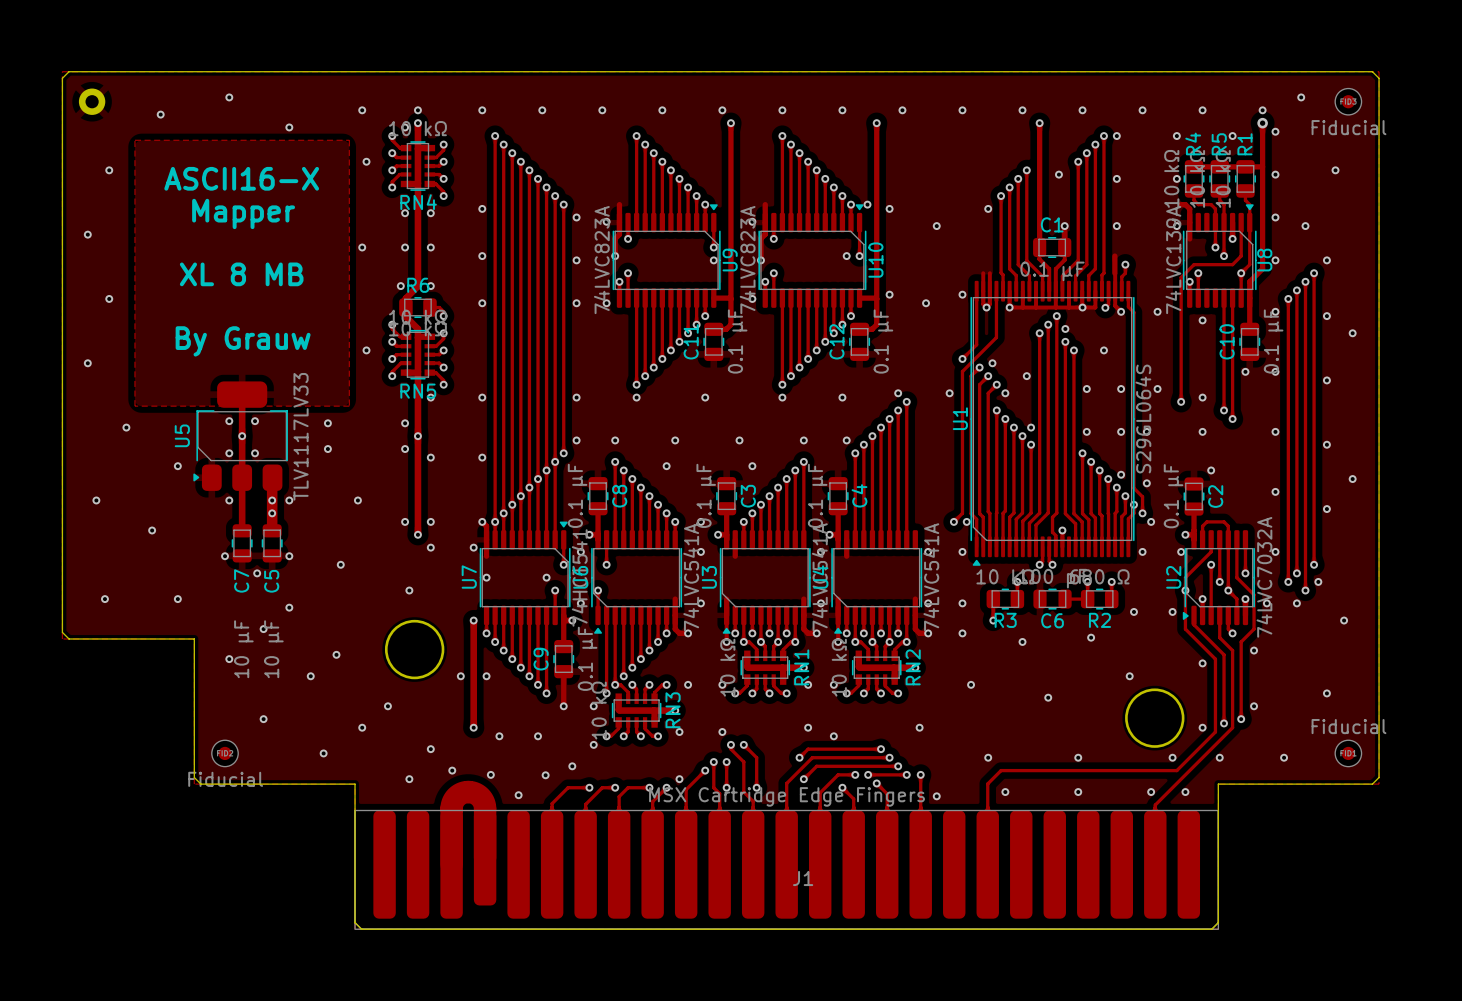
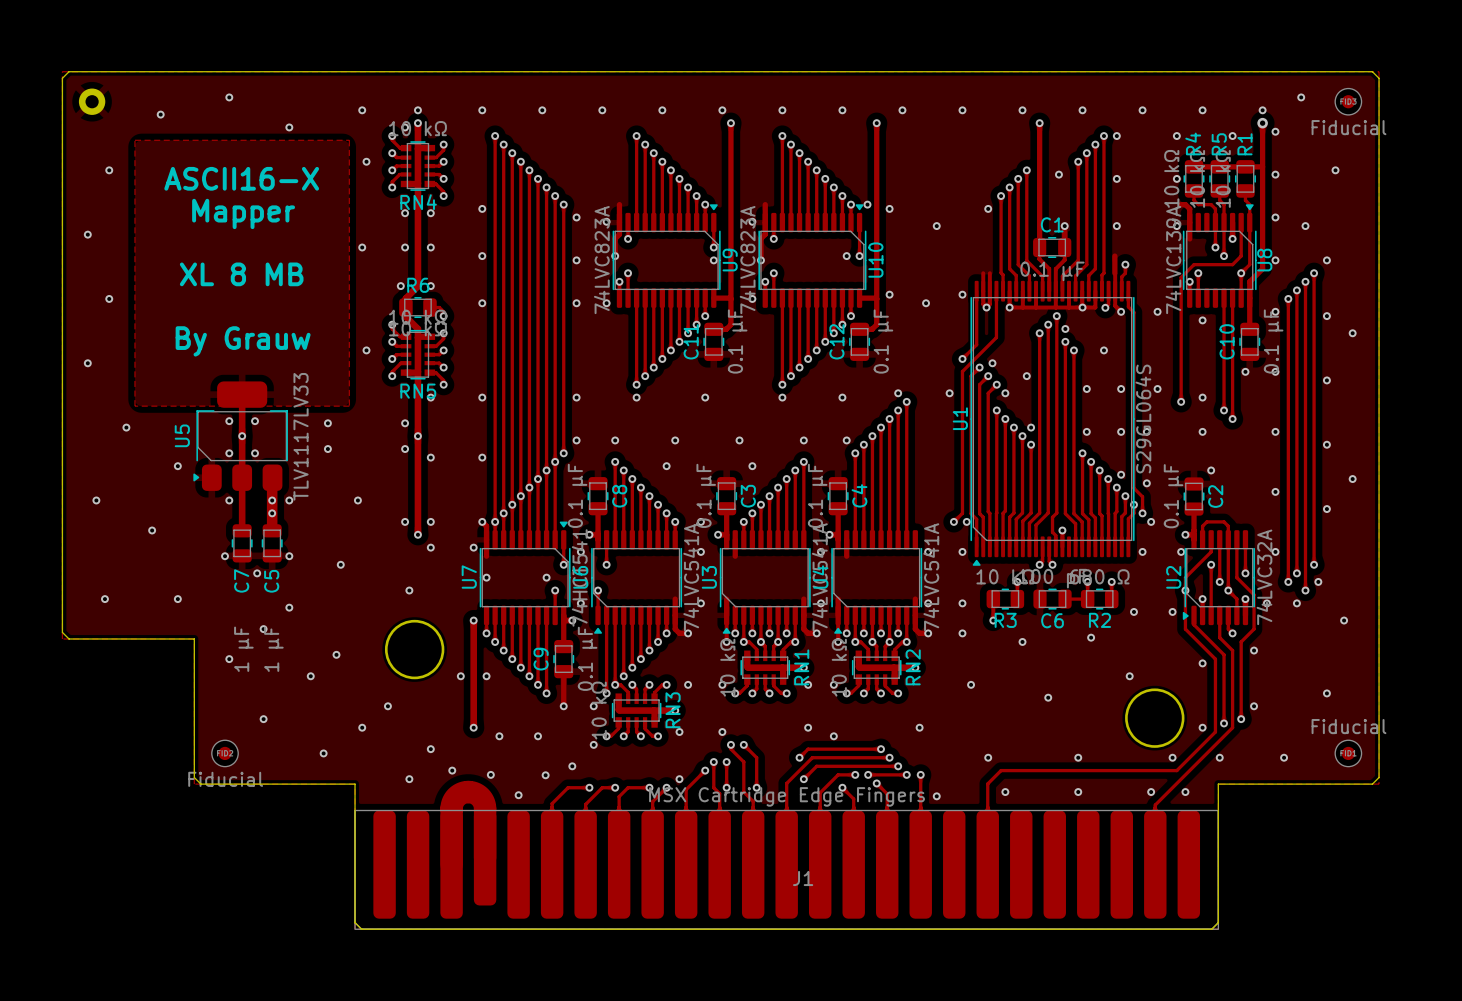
U2 value: 74LVC7032A (1264, 577) -> 74LVC32A (1264, 577)
C7 value: 10 µF (243, 649) -> 1 µF (243, 649)
C5 value: 10 µF (273, 649) -> 1 µF (273, 649)

